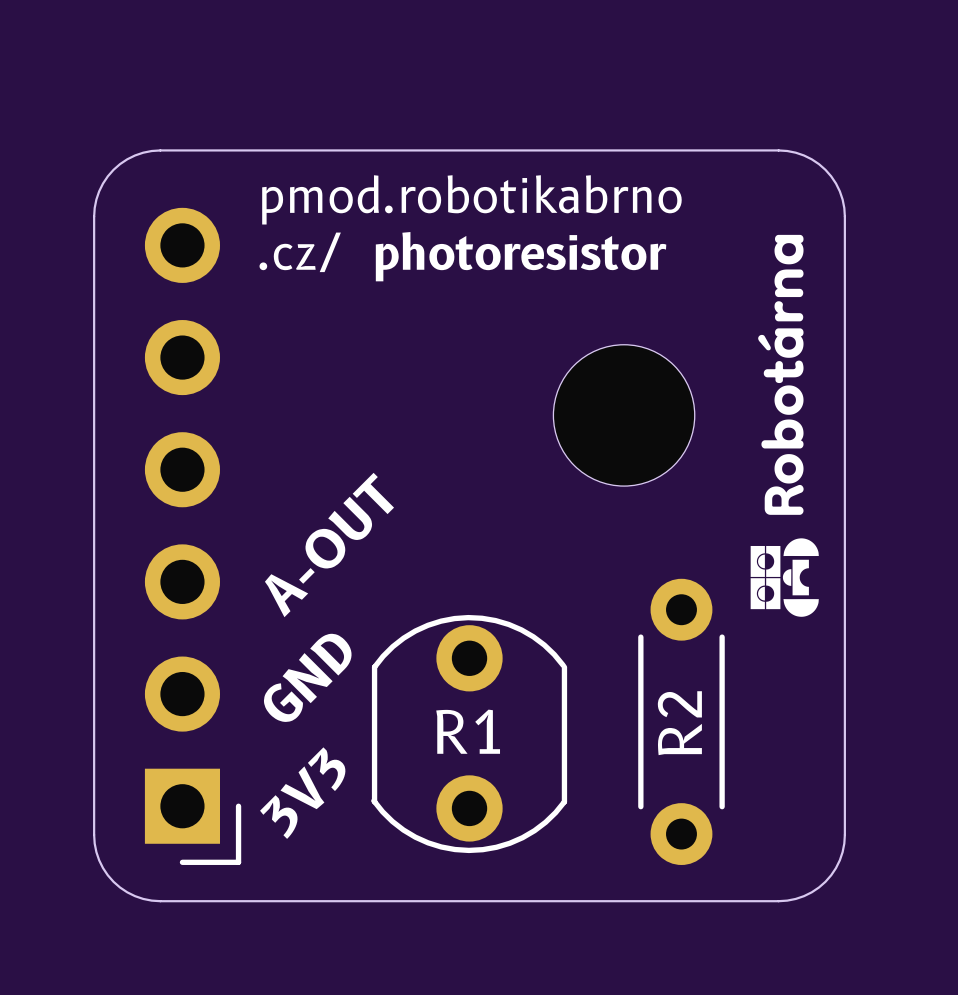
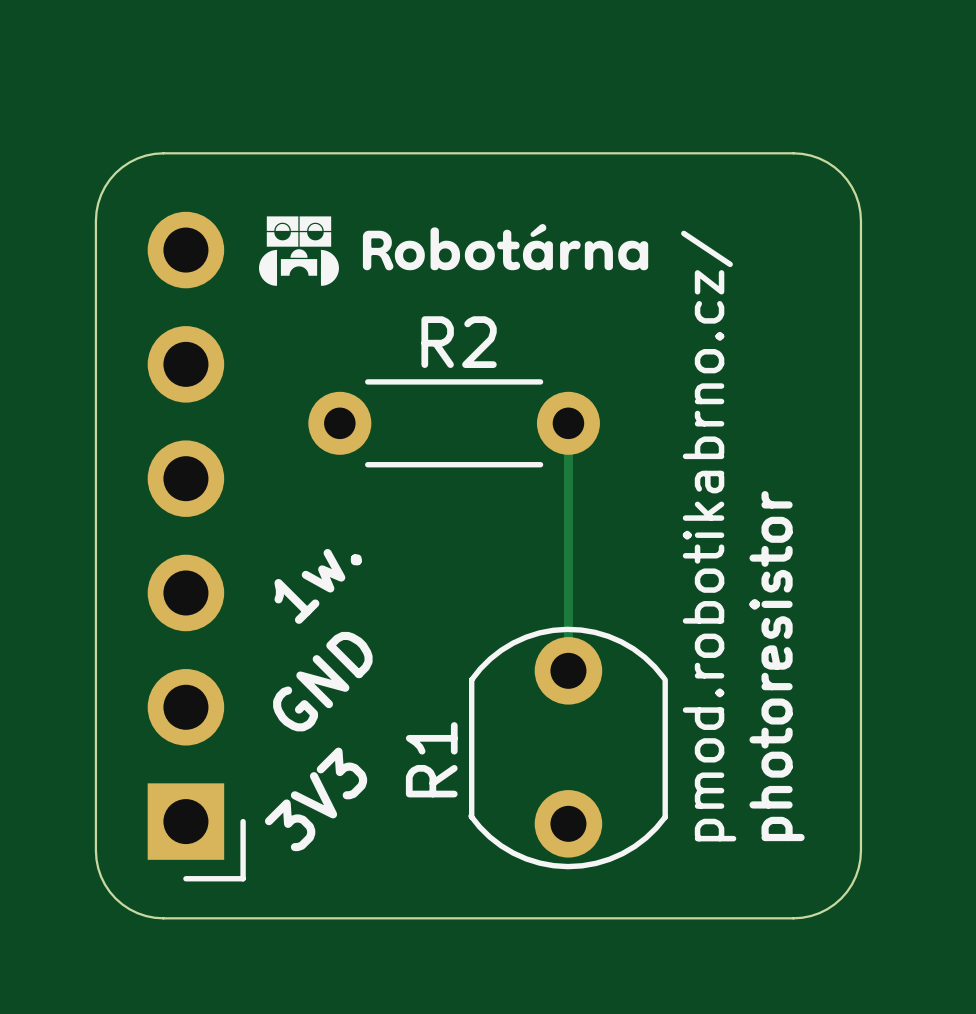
text: pmod.robotikabrno (471, 199) -> pmod.robotikabrno.cz/ (708, 536)
drawing: none -> [259, 216, 649, 286]
drawing: [750, 234, 819, 617] -> none
text: .cz/ (300, 252) -> none
text rotation: 0° (521, 256) -> 90° counterclockwise (777, 666)
track: none -> (568, 423) (568, 670)
part: (624, 415) -> none
text: A-OUT (329, 545) -> 1w. (318, 586)
R2 rotation: 0° (681, 721) -> 90° clockwise (454, 423)
R2 position: (681, 721) -> (454, 423)
R1 name rotation: 0° (468, 731) -> 90° counterclockwise (431, 759)
R1 position: (469, 734) -> (568, 747)

